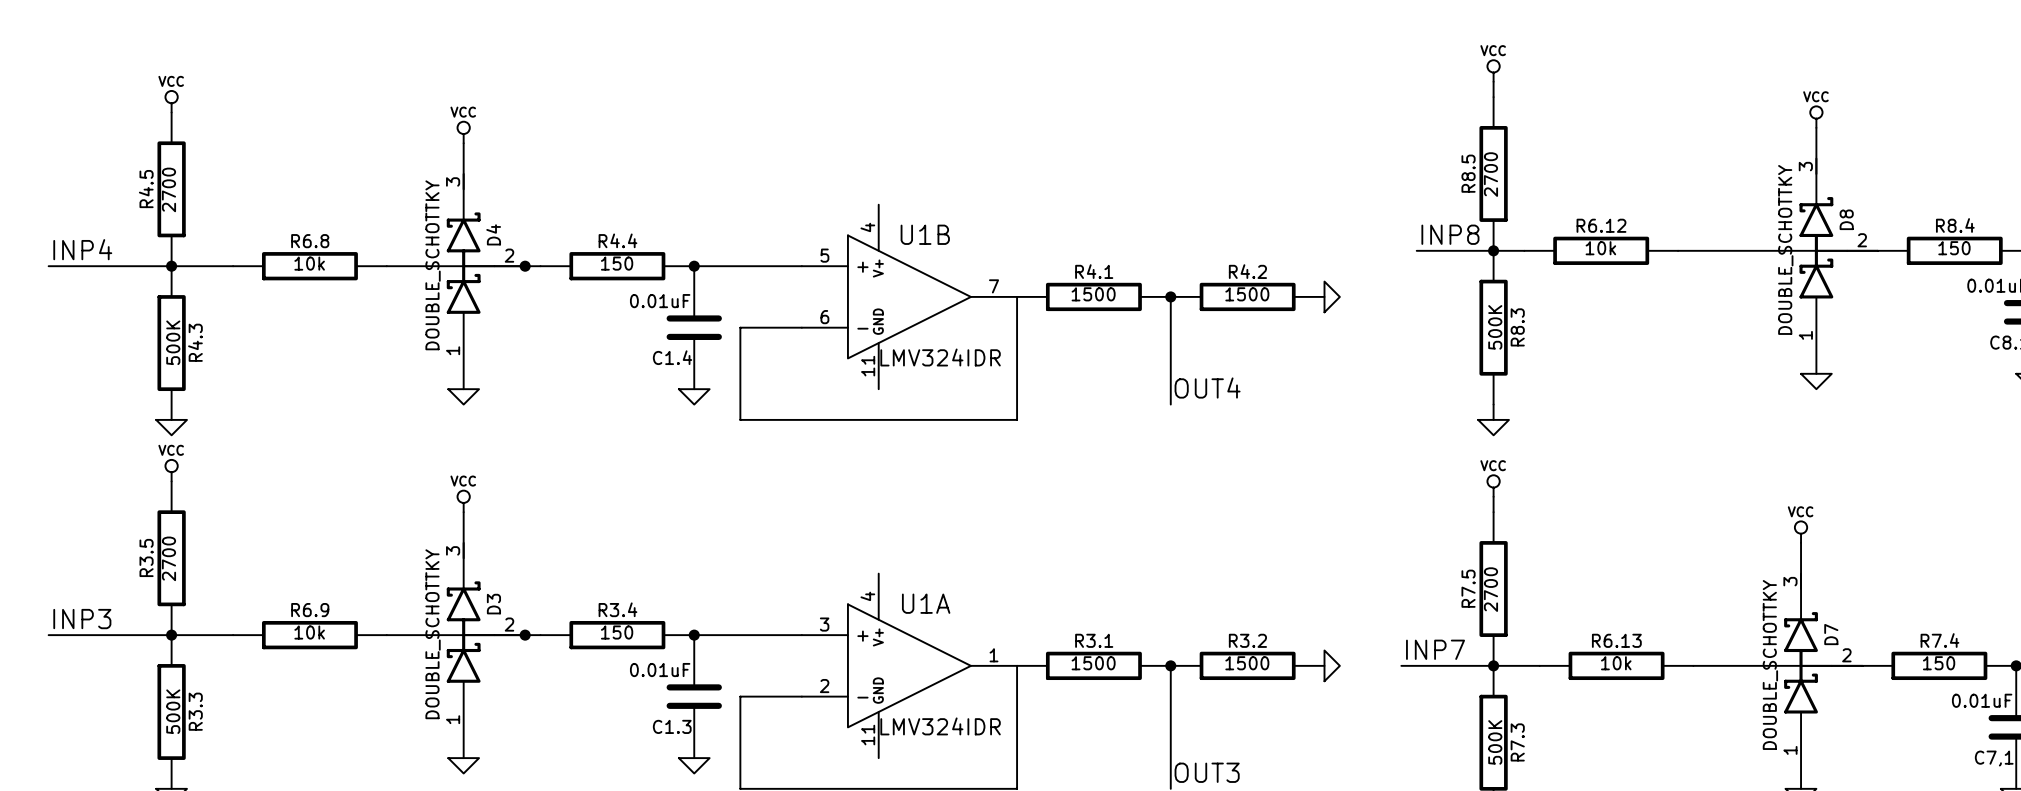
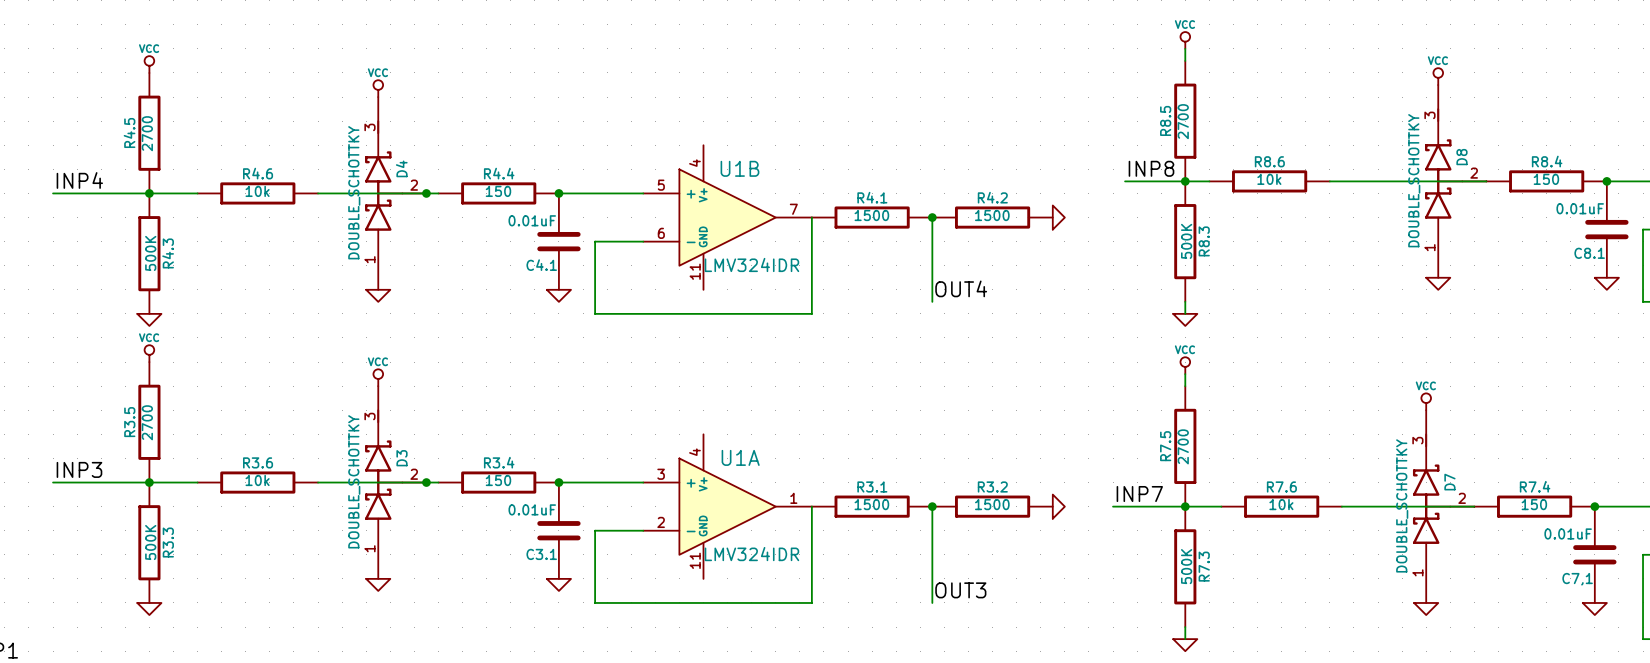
R6.12 name: R6.12 (1601, 225) -> R8.6 (1269, 161)
R6.8 name: R6.8 (310, 241) -> R4.6 (258, 173)
C1.4 name: C1.4 (672, 357) -> C4.1 (541, 265)
R6.9 name: R6.9 (310, 610) -> R3.6 (258, 462)
R6.13 name: R6.13 (1616, 640) -> R7.6 (1281, 486)
C1.3 name: C1.3 (672, 726) -> C3.1 (541, 554)

